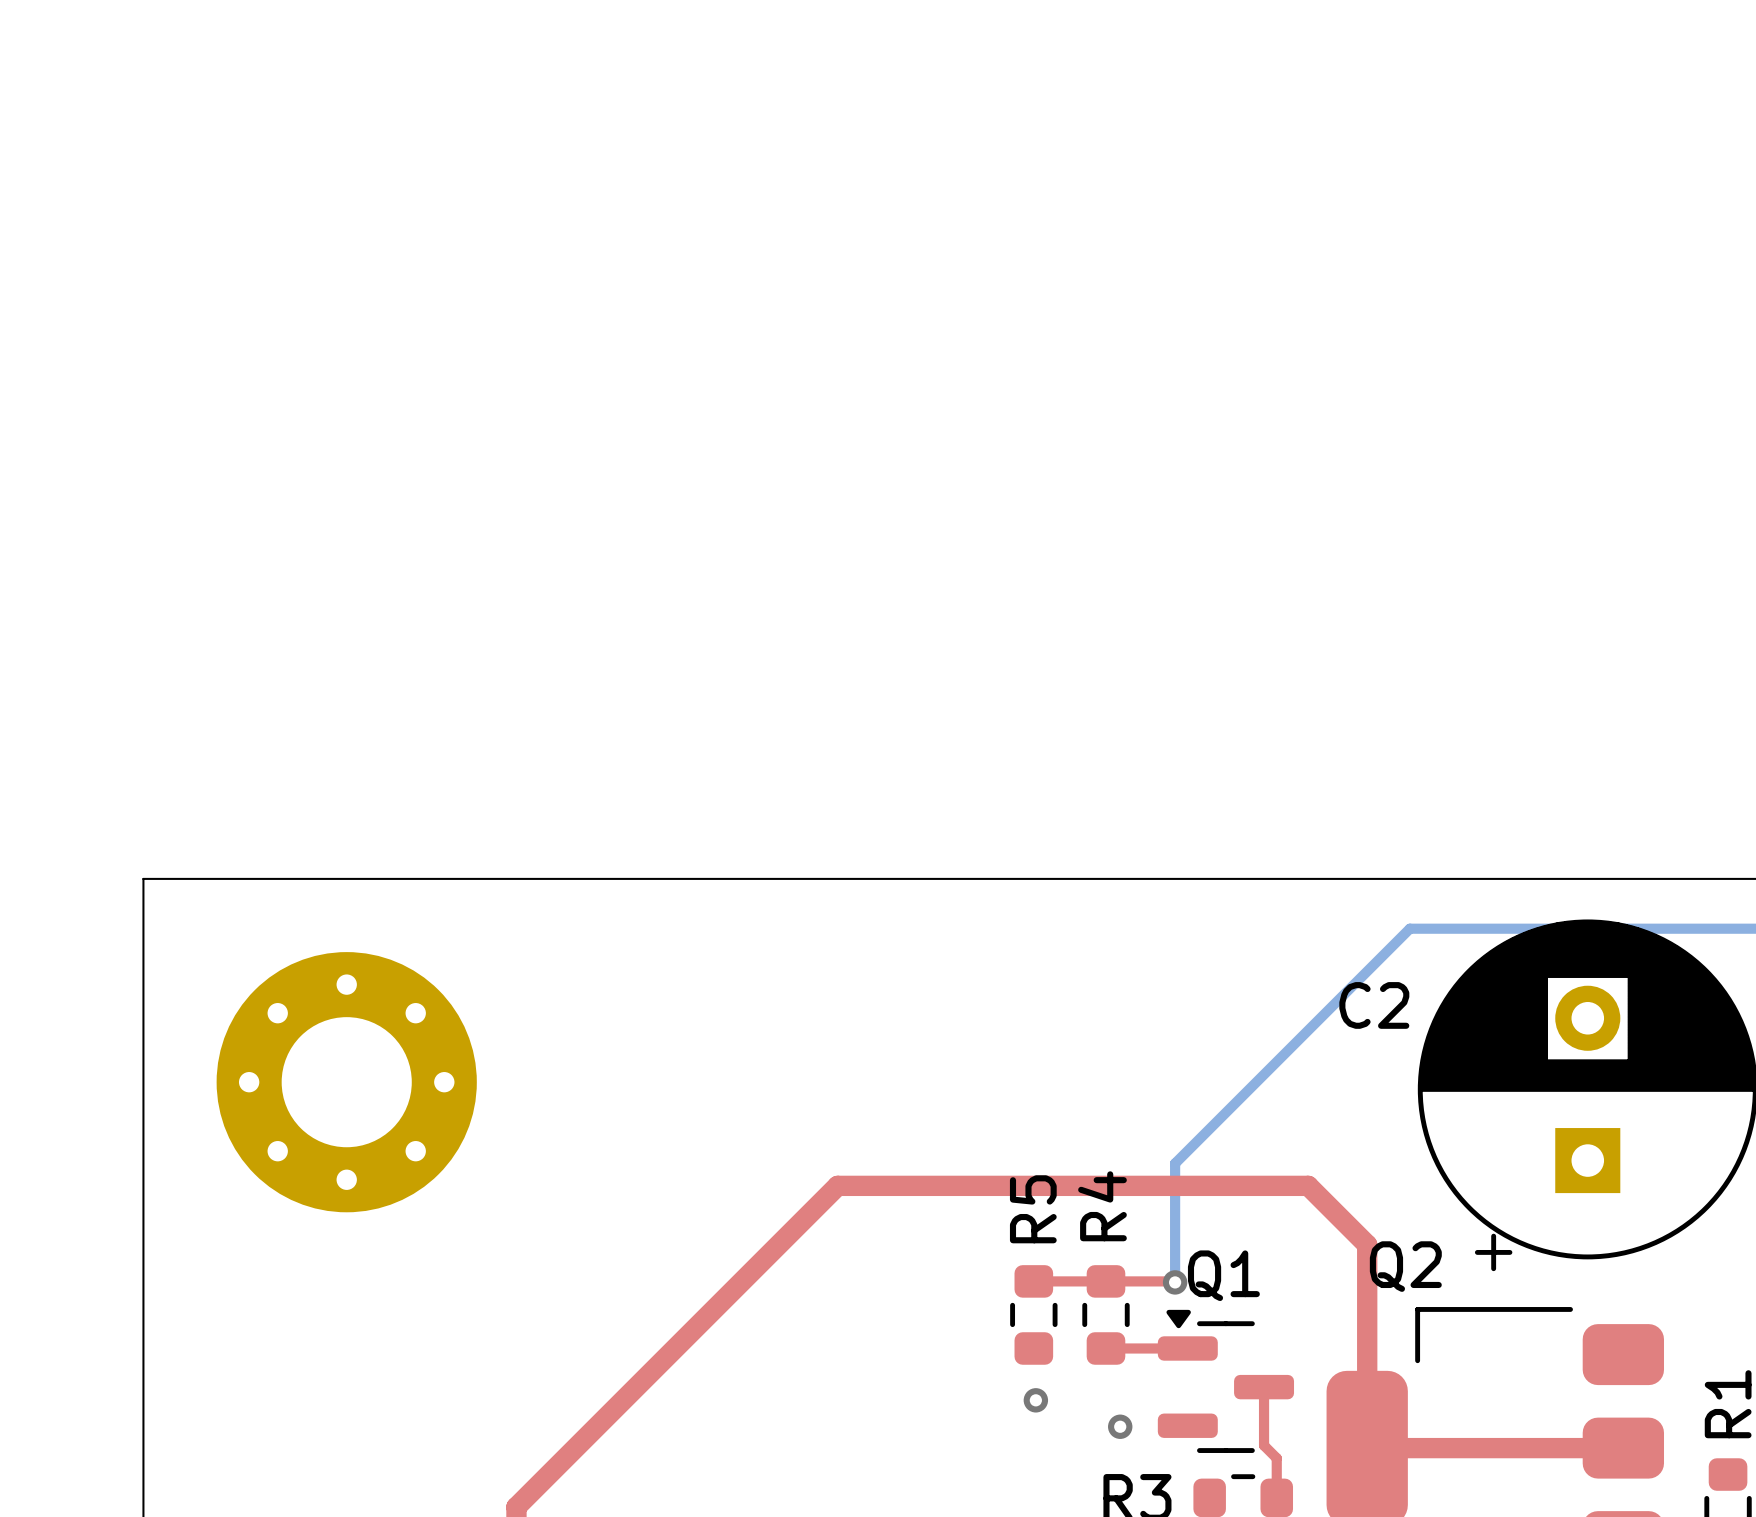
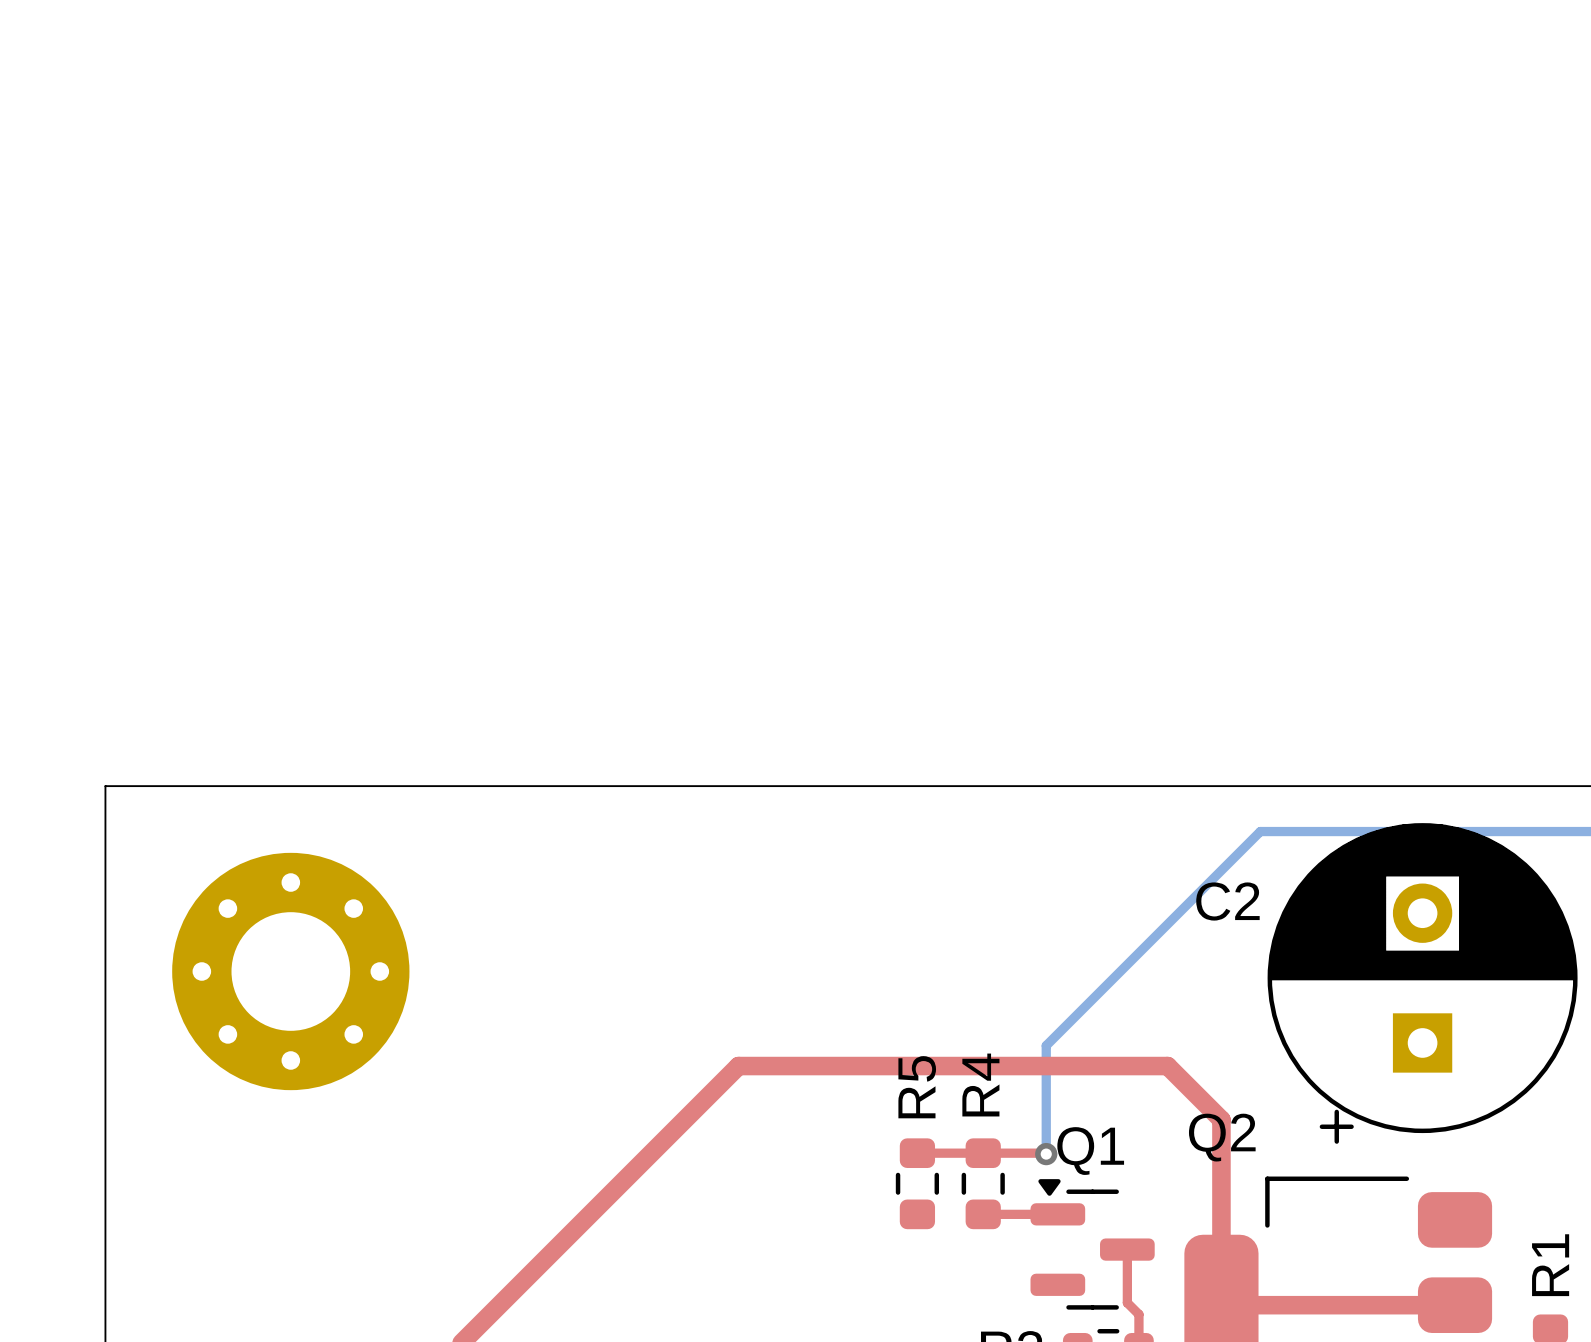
Q2 name position: Q2 (1405, 1266) -> Q2 (1222, 1137)
via: (1035, 1400) -> none
via: (1120, 1426) -> none

